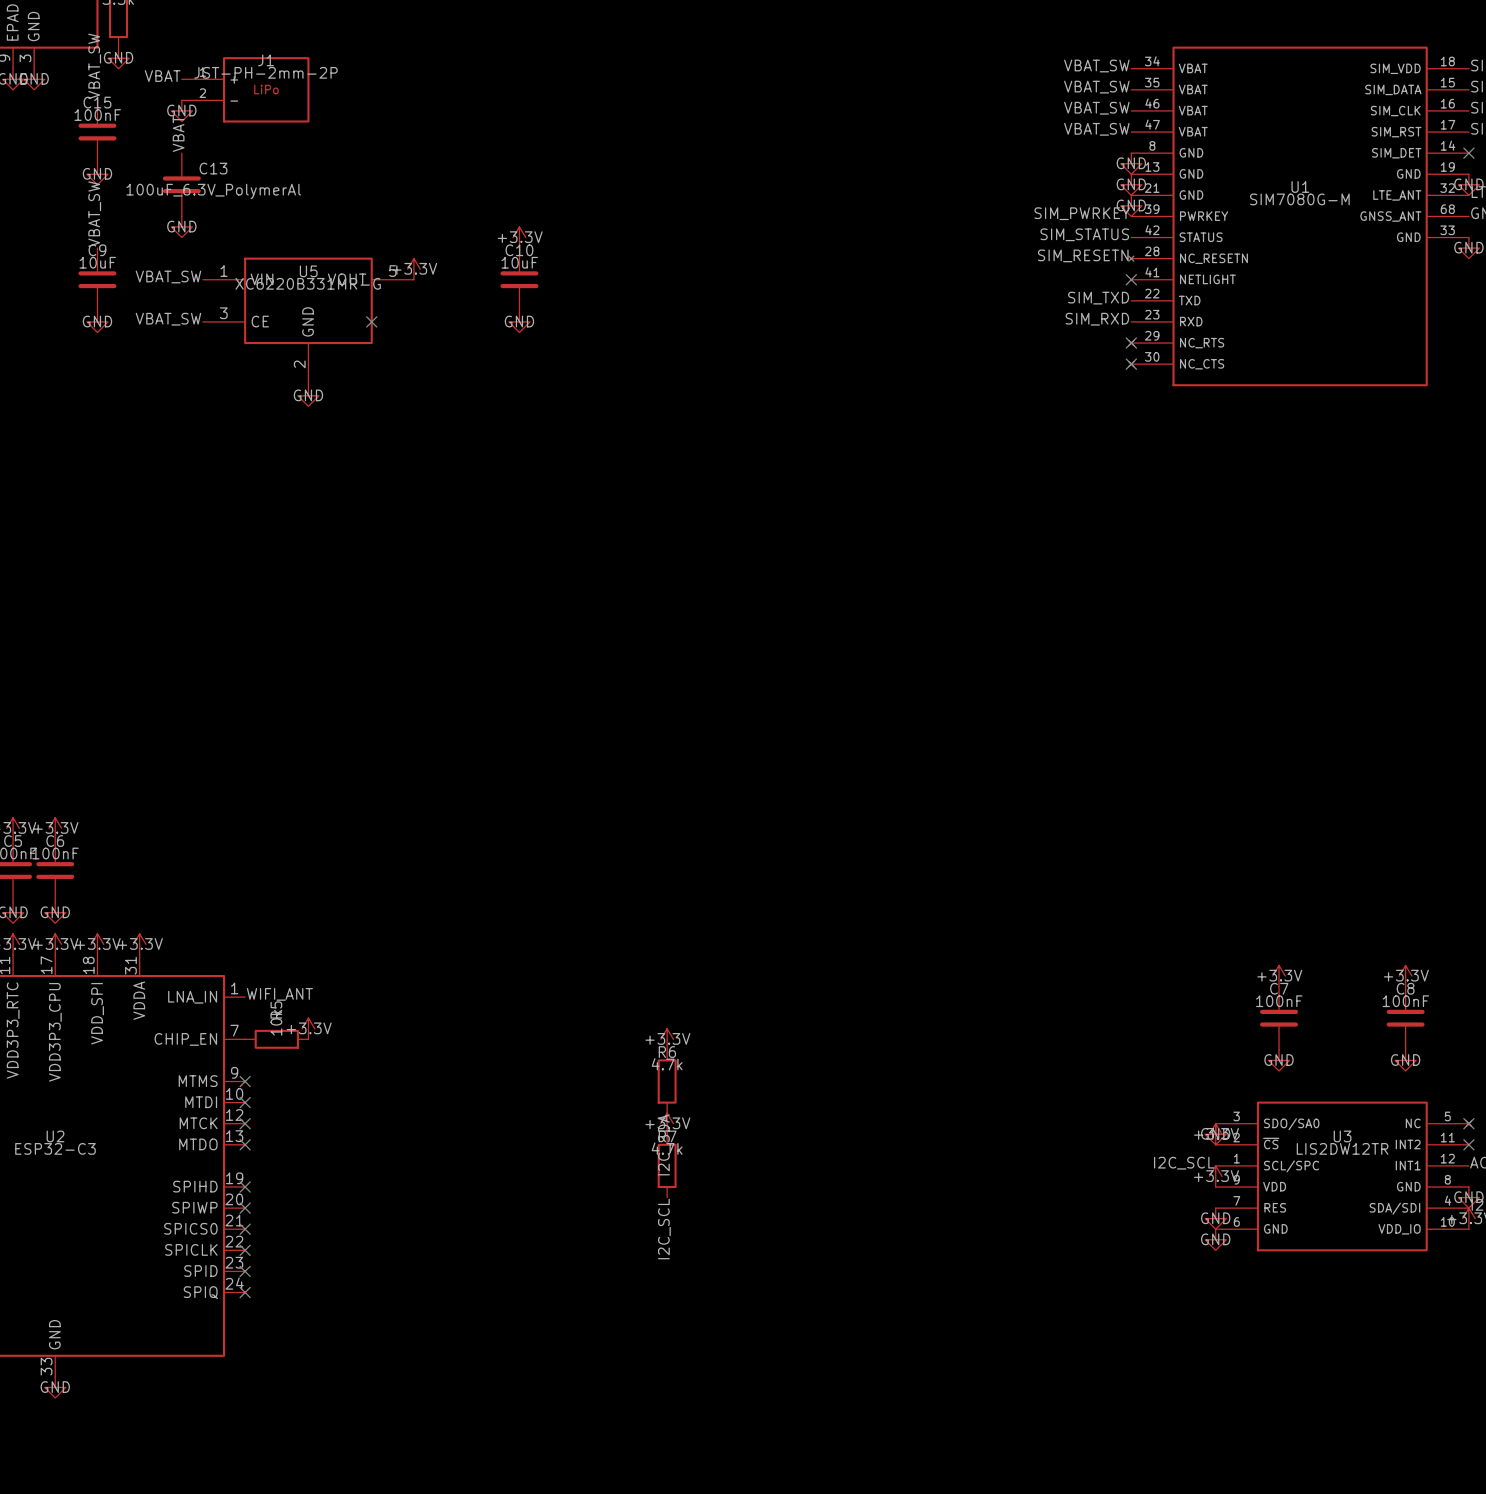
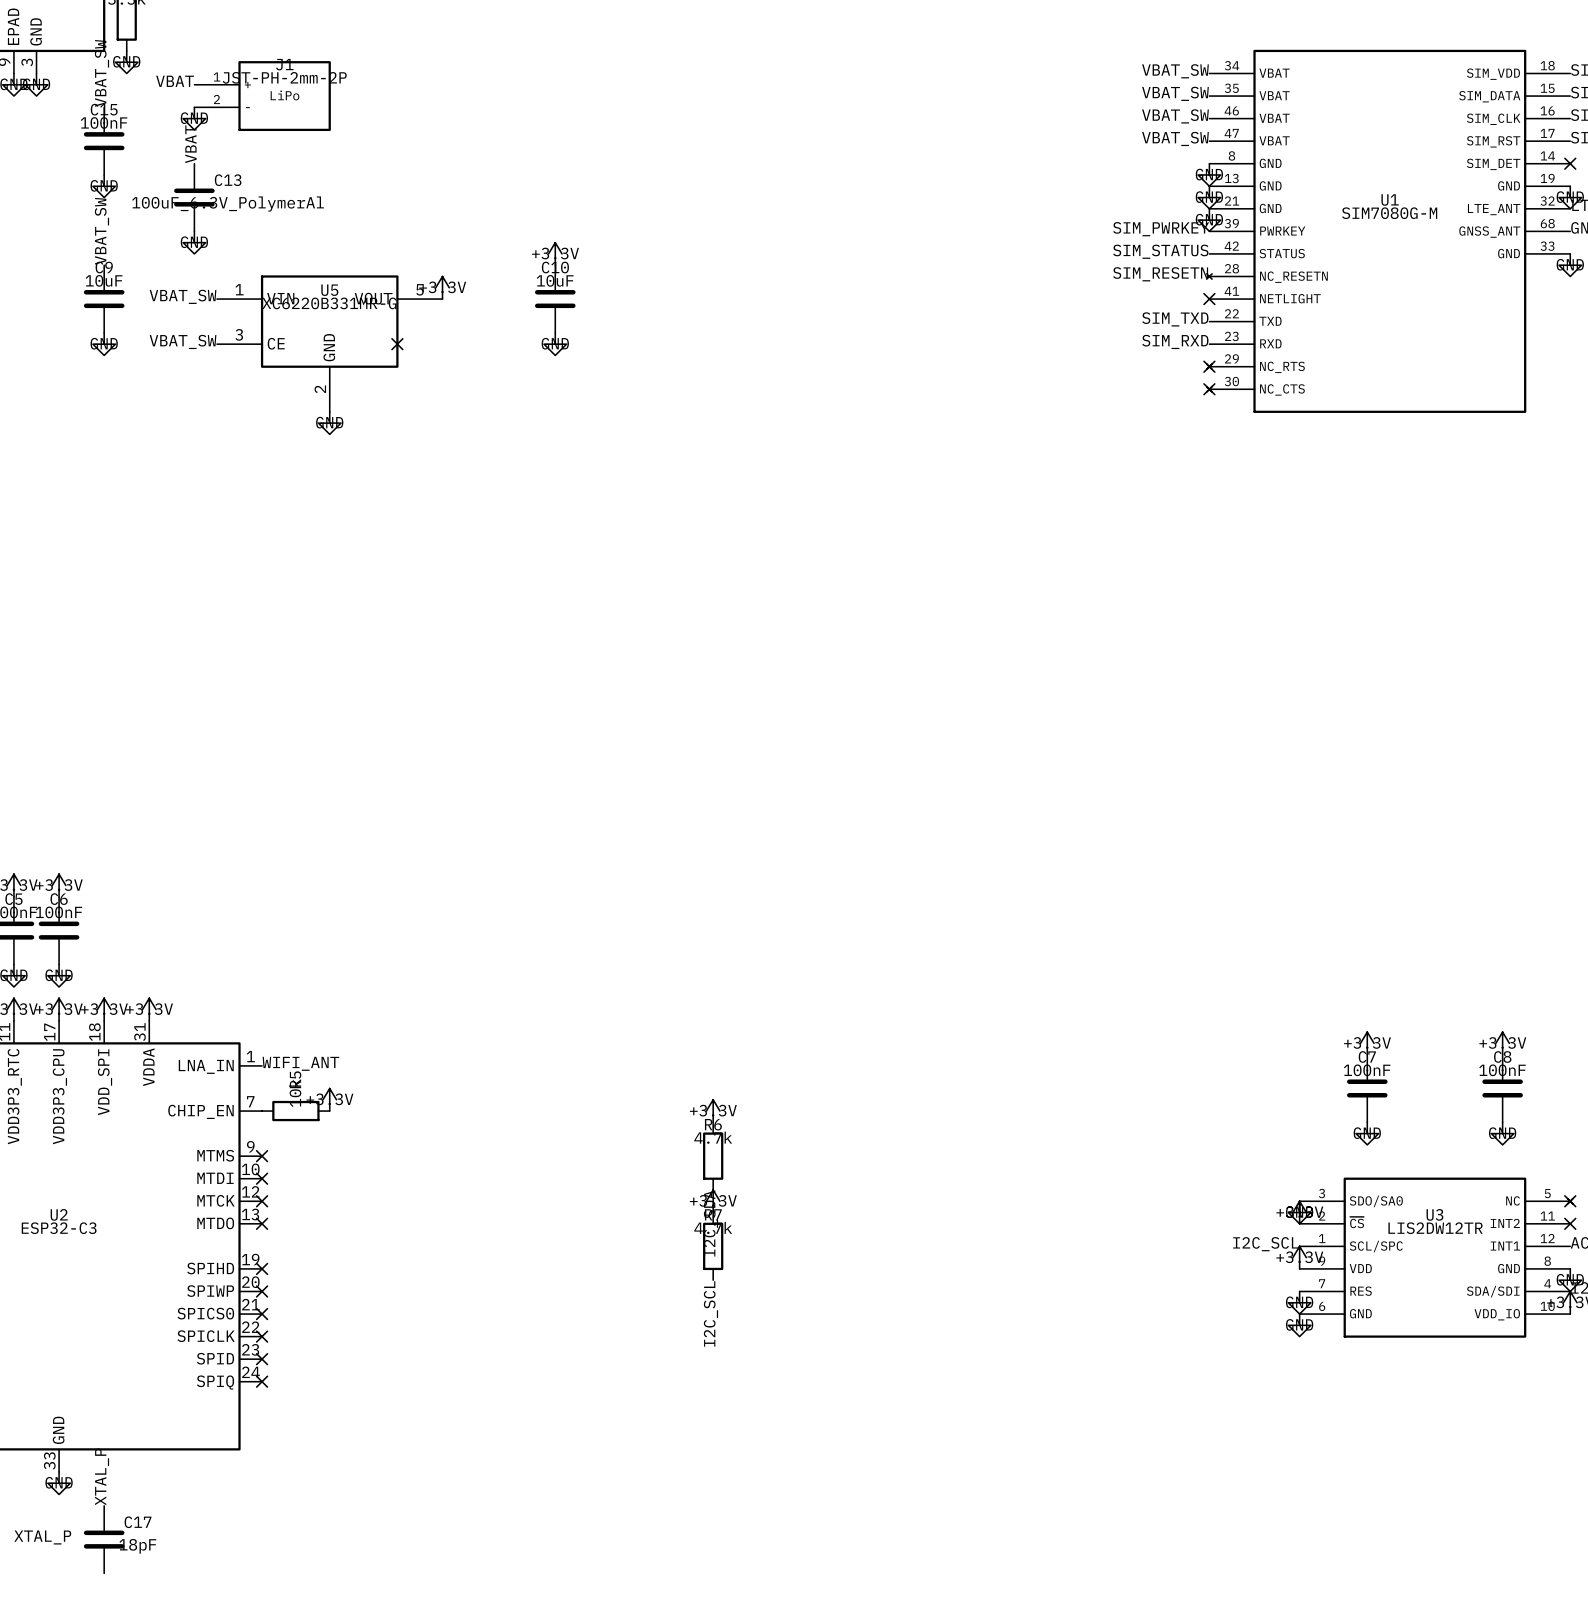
label: none -> XTAL_P (102, 1476)
label: none -> XTAL_P (42, 1537)
C17: none -> 18pF (104, 1539)

